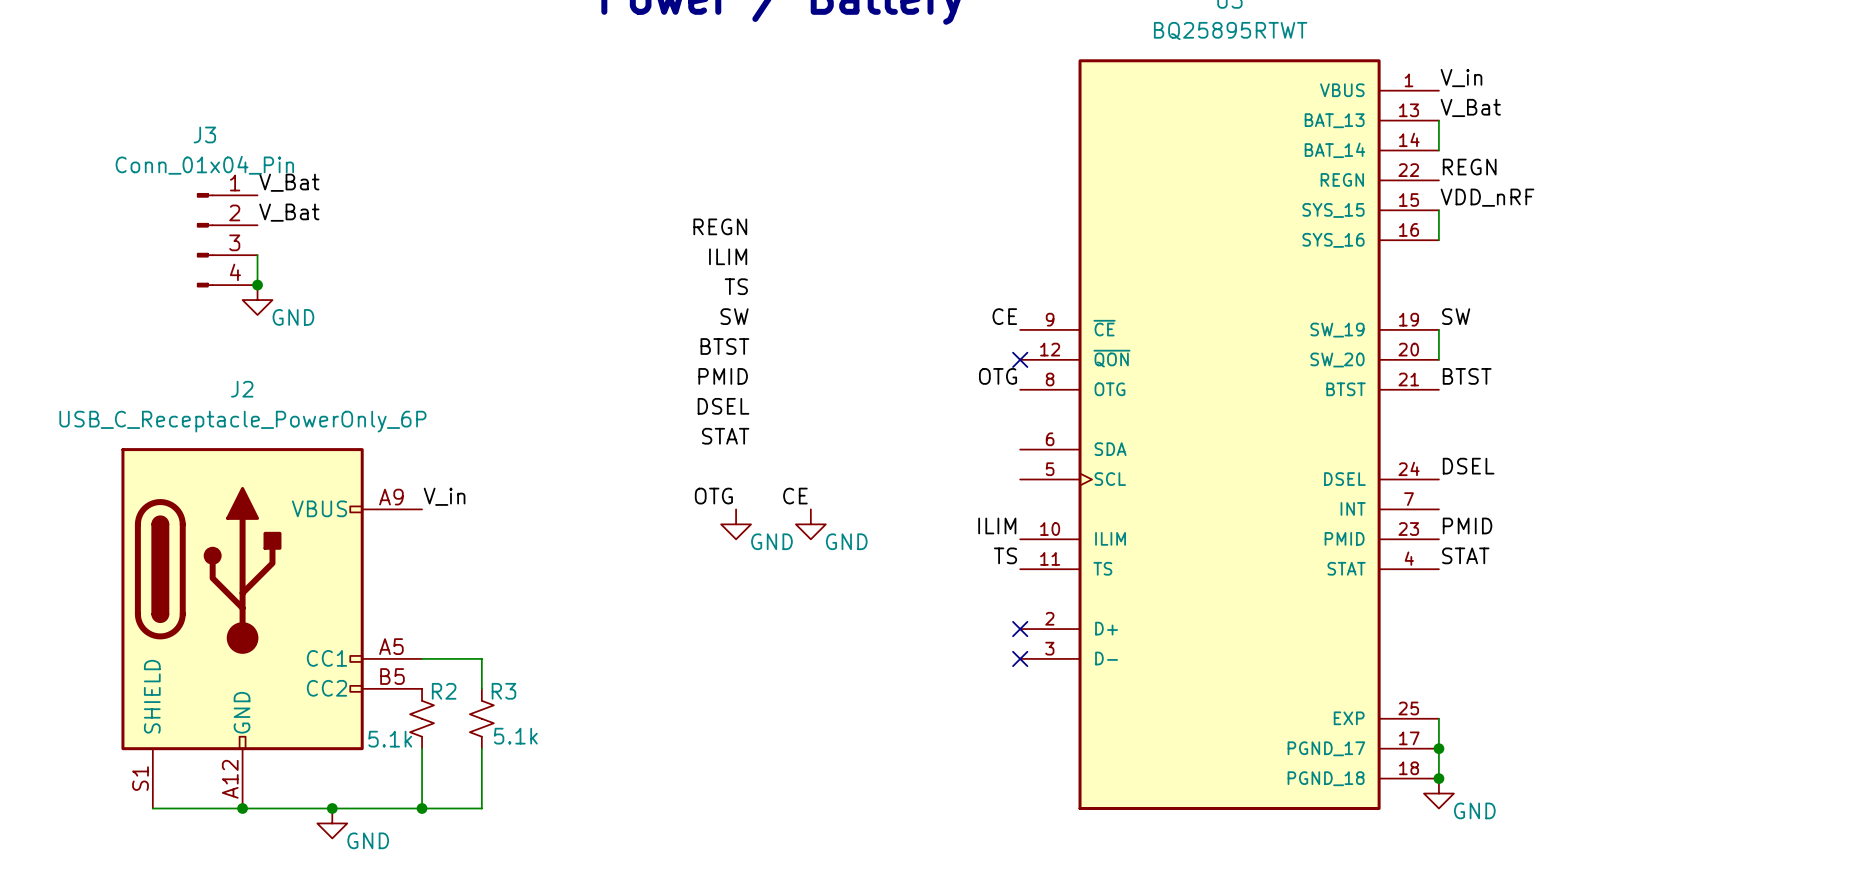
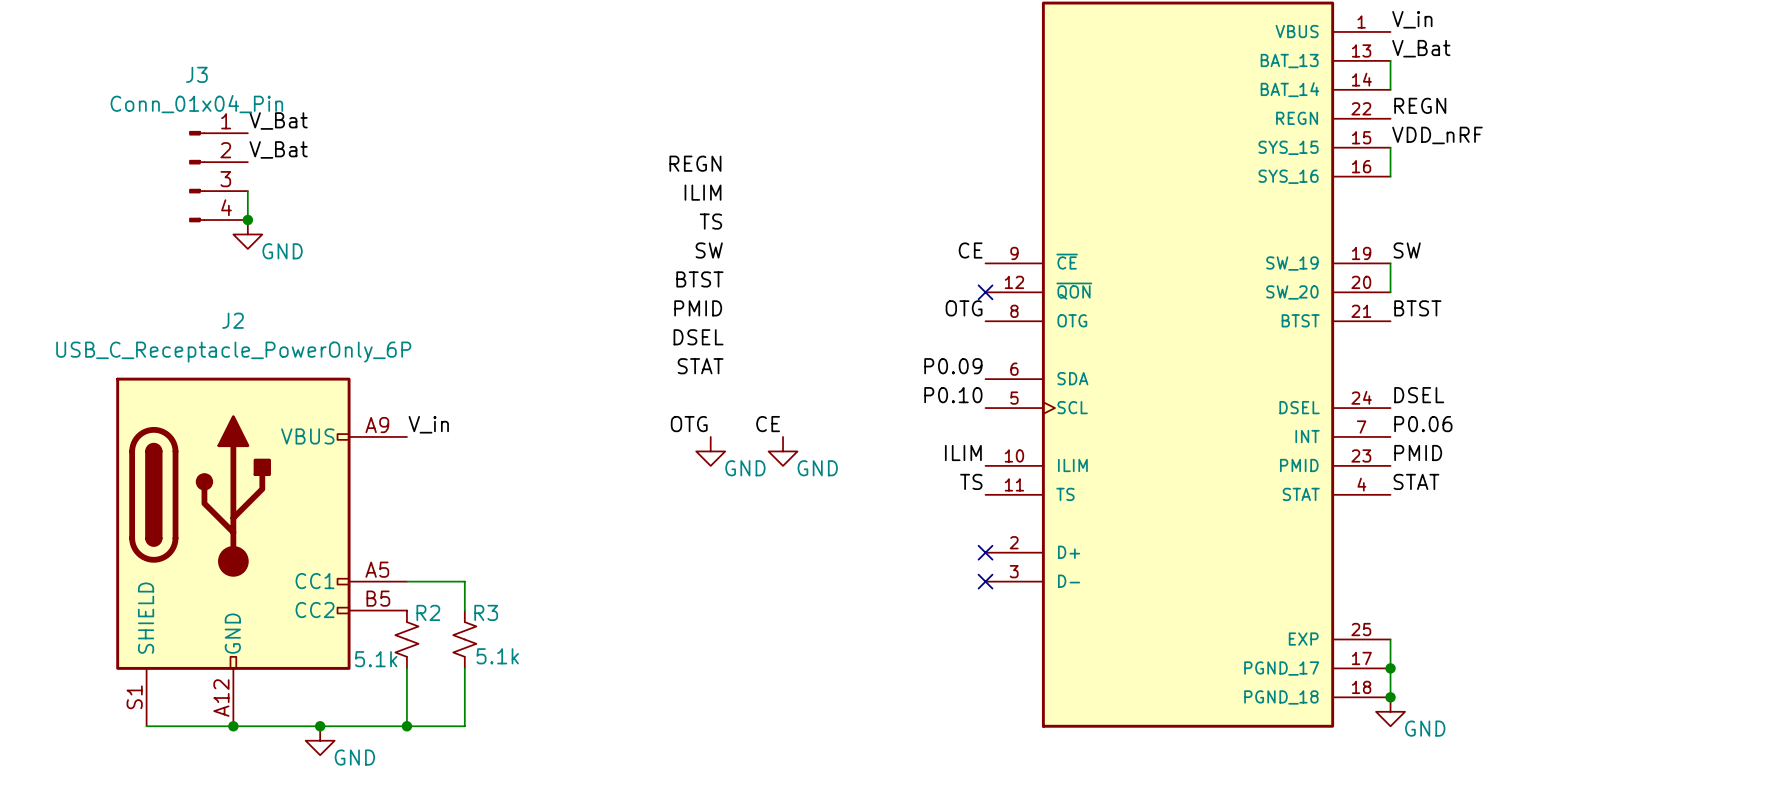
label: none -> P0.09 (953, 366)
label: none -> P0.10 (953, 395)
label: none -> P0.06 (1423, 424)

